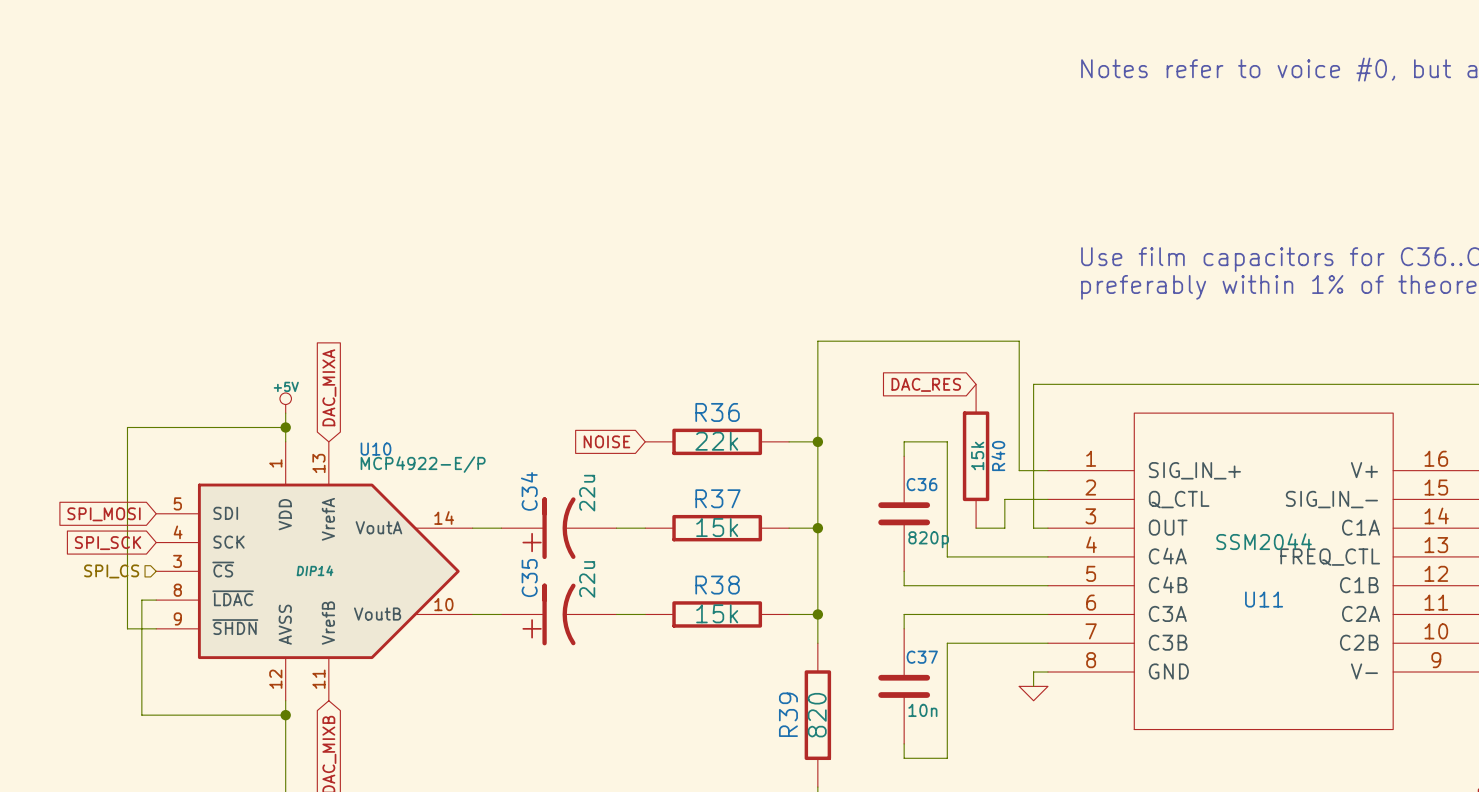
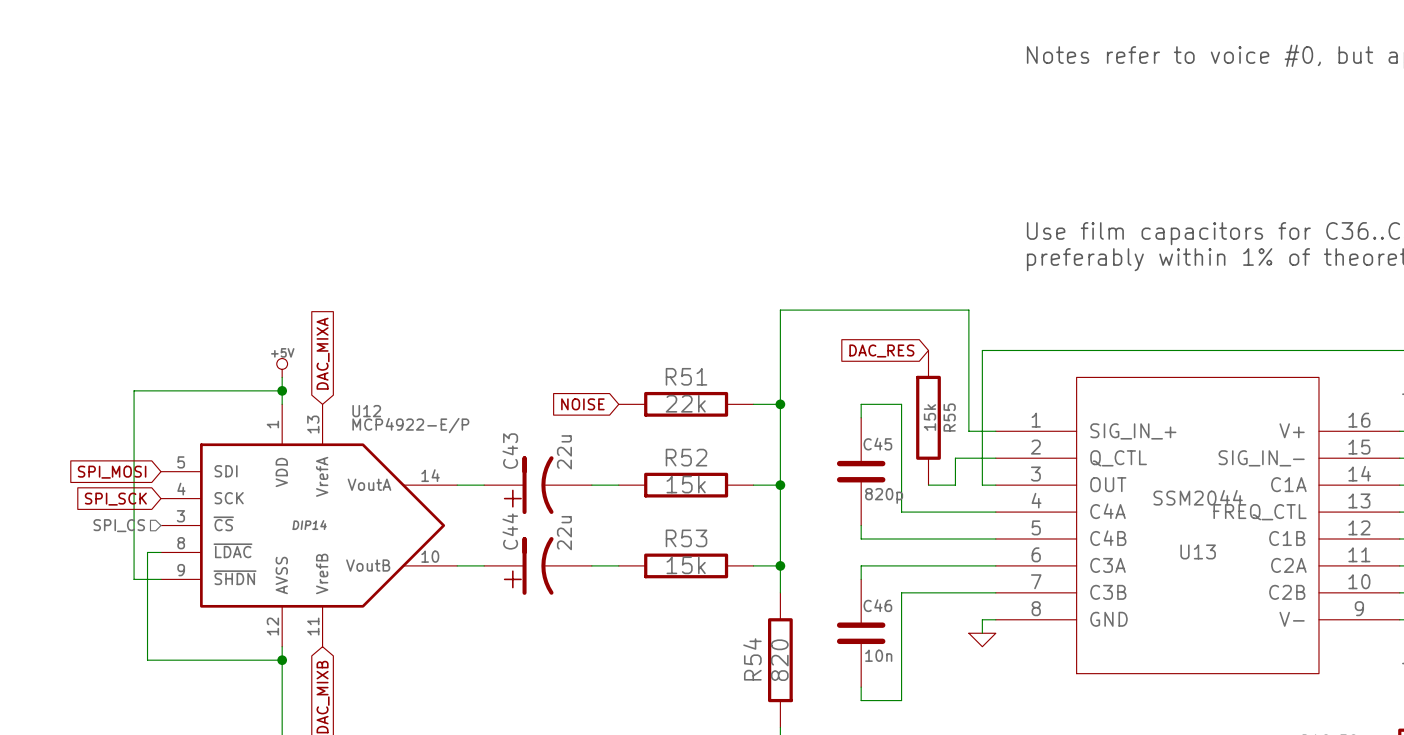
R36 name: R36 (717, 412) -> R51 (686, 376)
U10 name: U10 (376, 449) -> U12 (366, 411)
R40 name: R40 (998, 455) -> R55 (949, 417)
C36 name: C36 (922, 484) -> C45 (877, 444)
C34 name: C34 (529, 491) -> C43 (510, 451)
R37 name: R37 (718, 498) -> R52 (686, 457)
C35 name: C35 (529, 578) -> C44 (510, 531)
R38 name: R38 (717, 585) -> R53 (686, 538)
U11 name: U11 (1264, 599) -> U13 (1198, 551)
C37 name: C37 (922, 657) -> C46 (877, 605)
R39 name: R39 (788, 714) -> R54 (752, 659)

